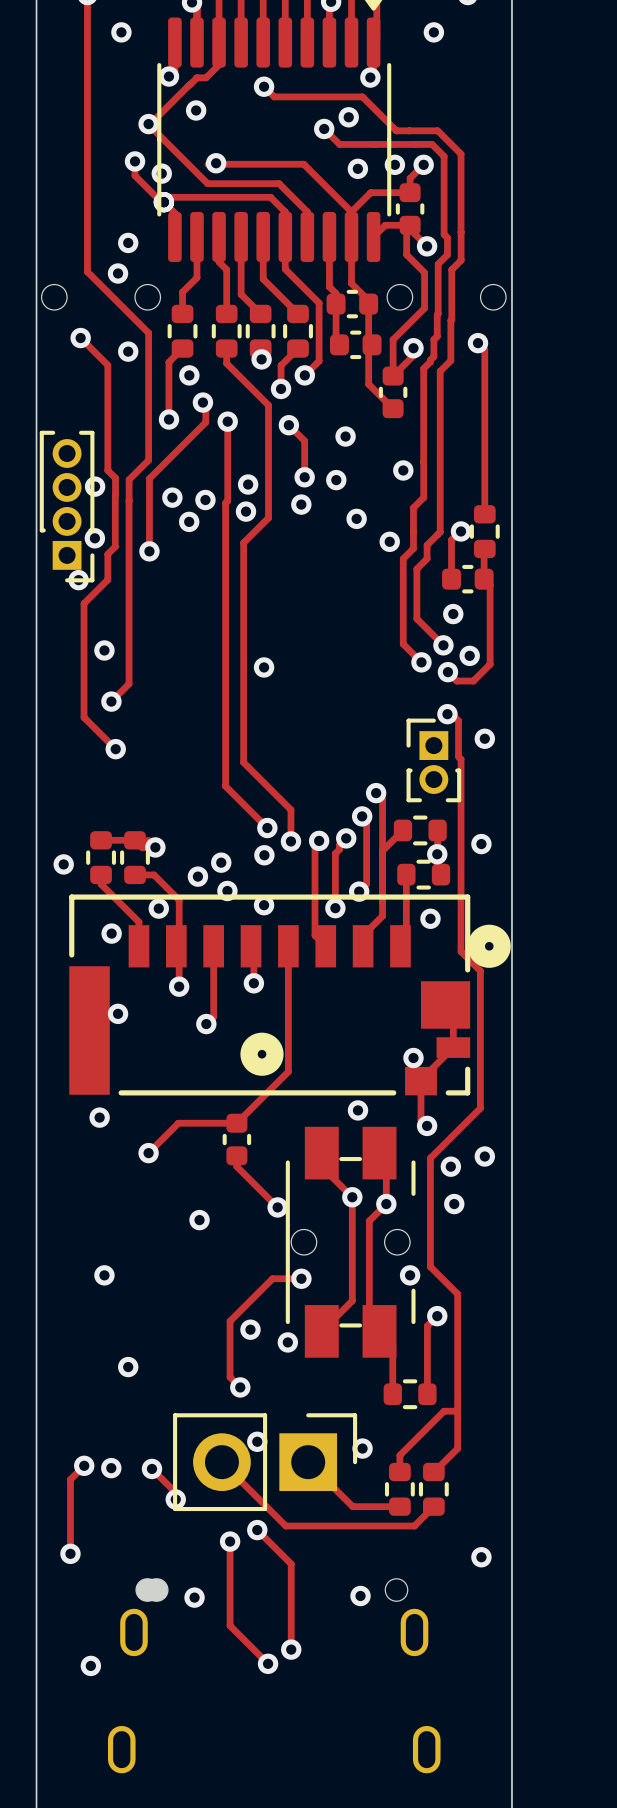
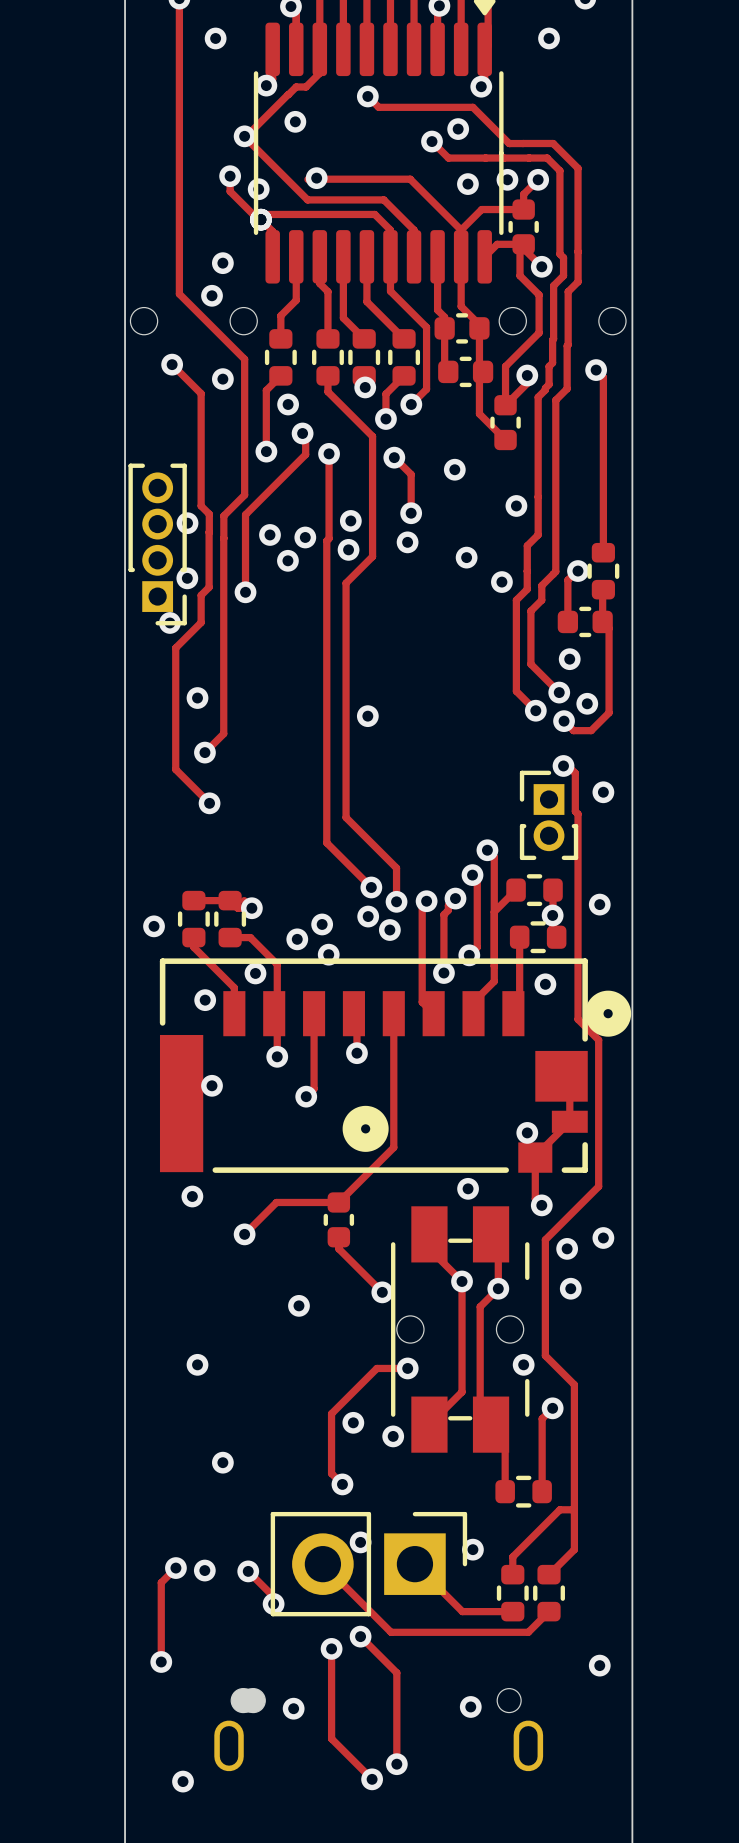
via: (336, 480) -> none
via position: (264, 905) -> (389, 930)

